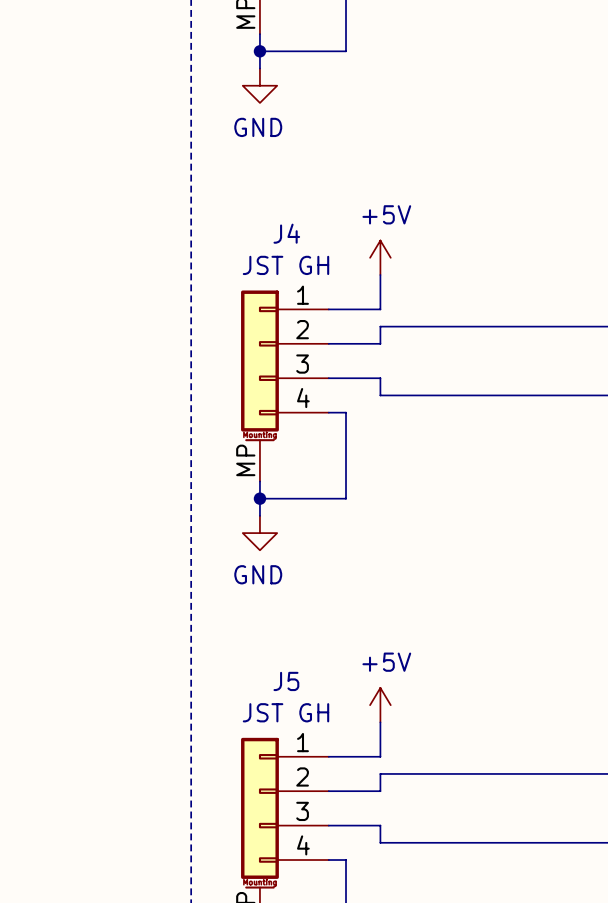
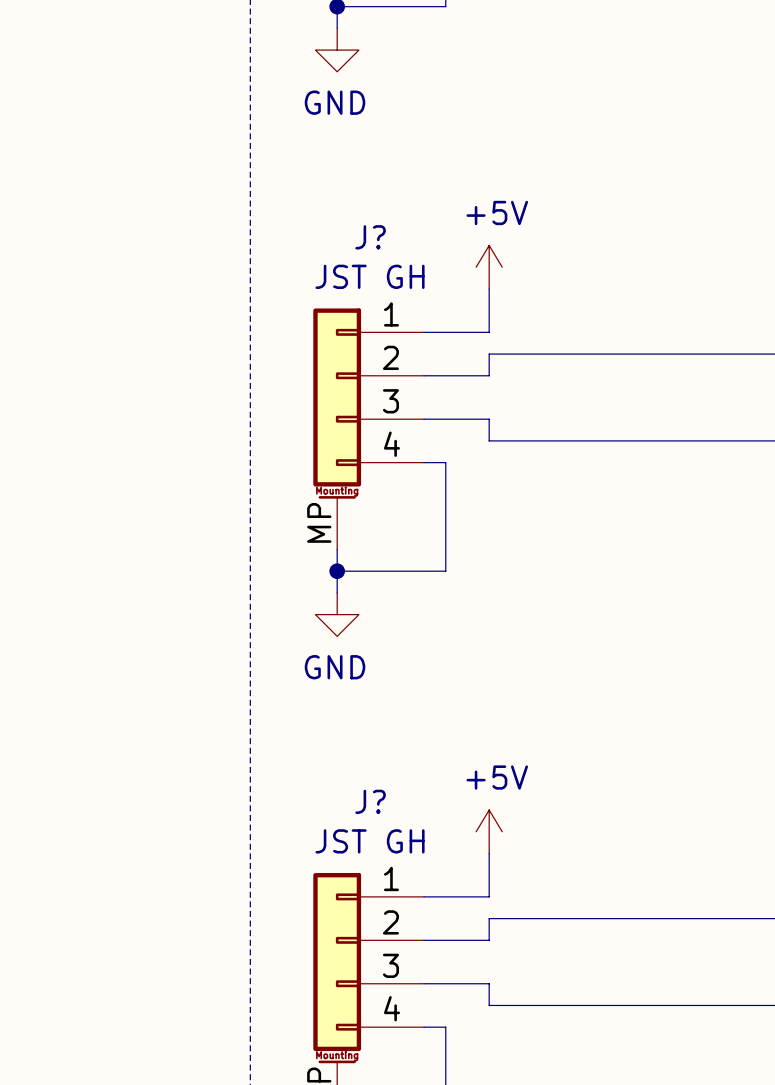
J4 name: J4 (286, 233) -> J? (370, 237)
J5 name: J5 (286, 681) -> J? (370, 801)

